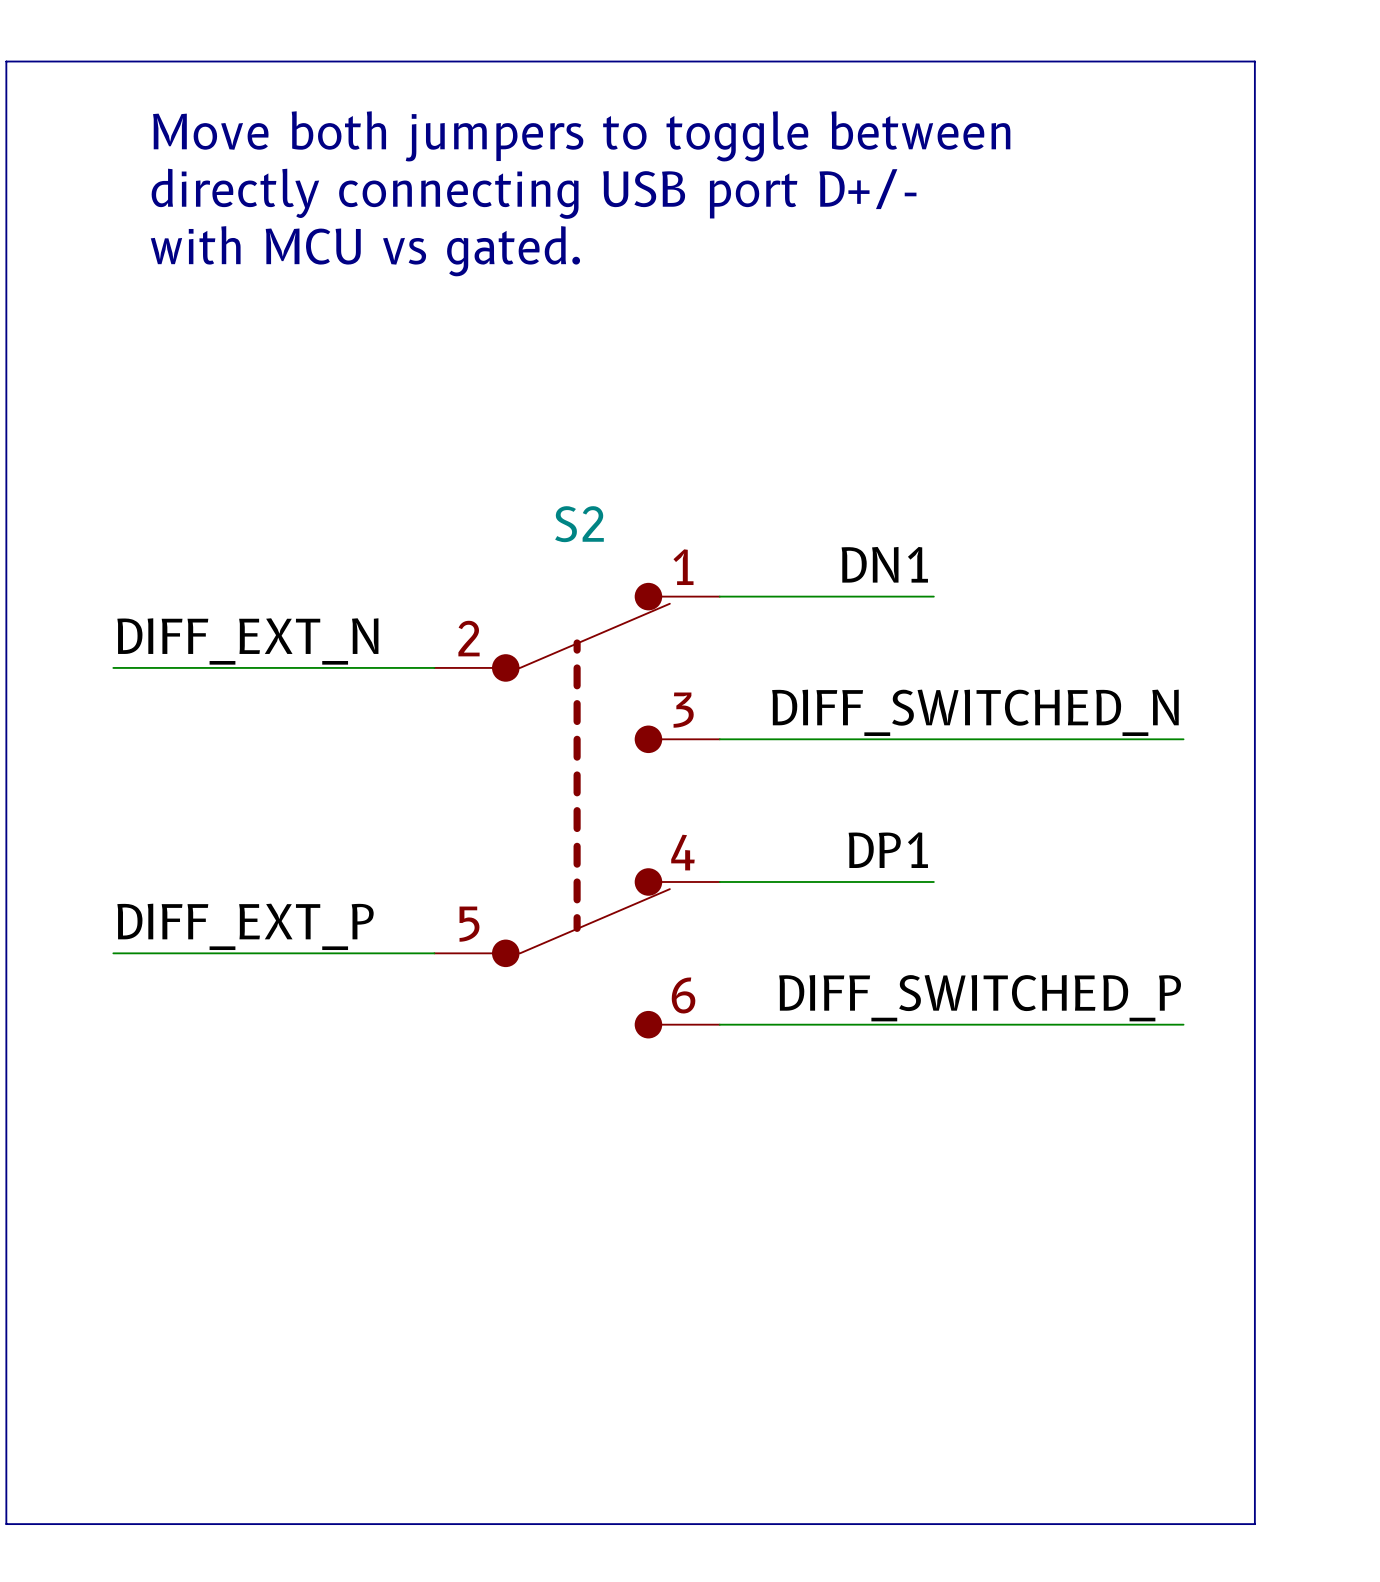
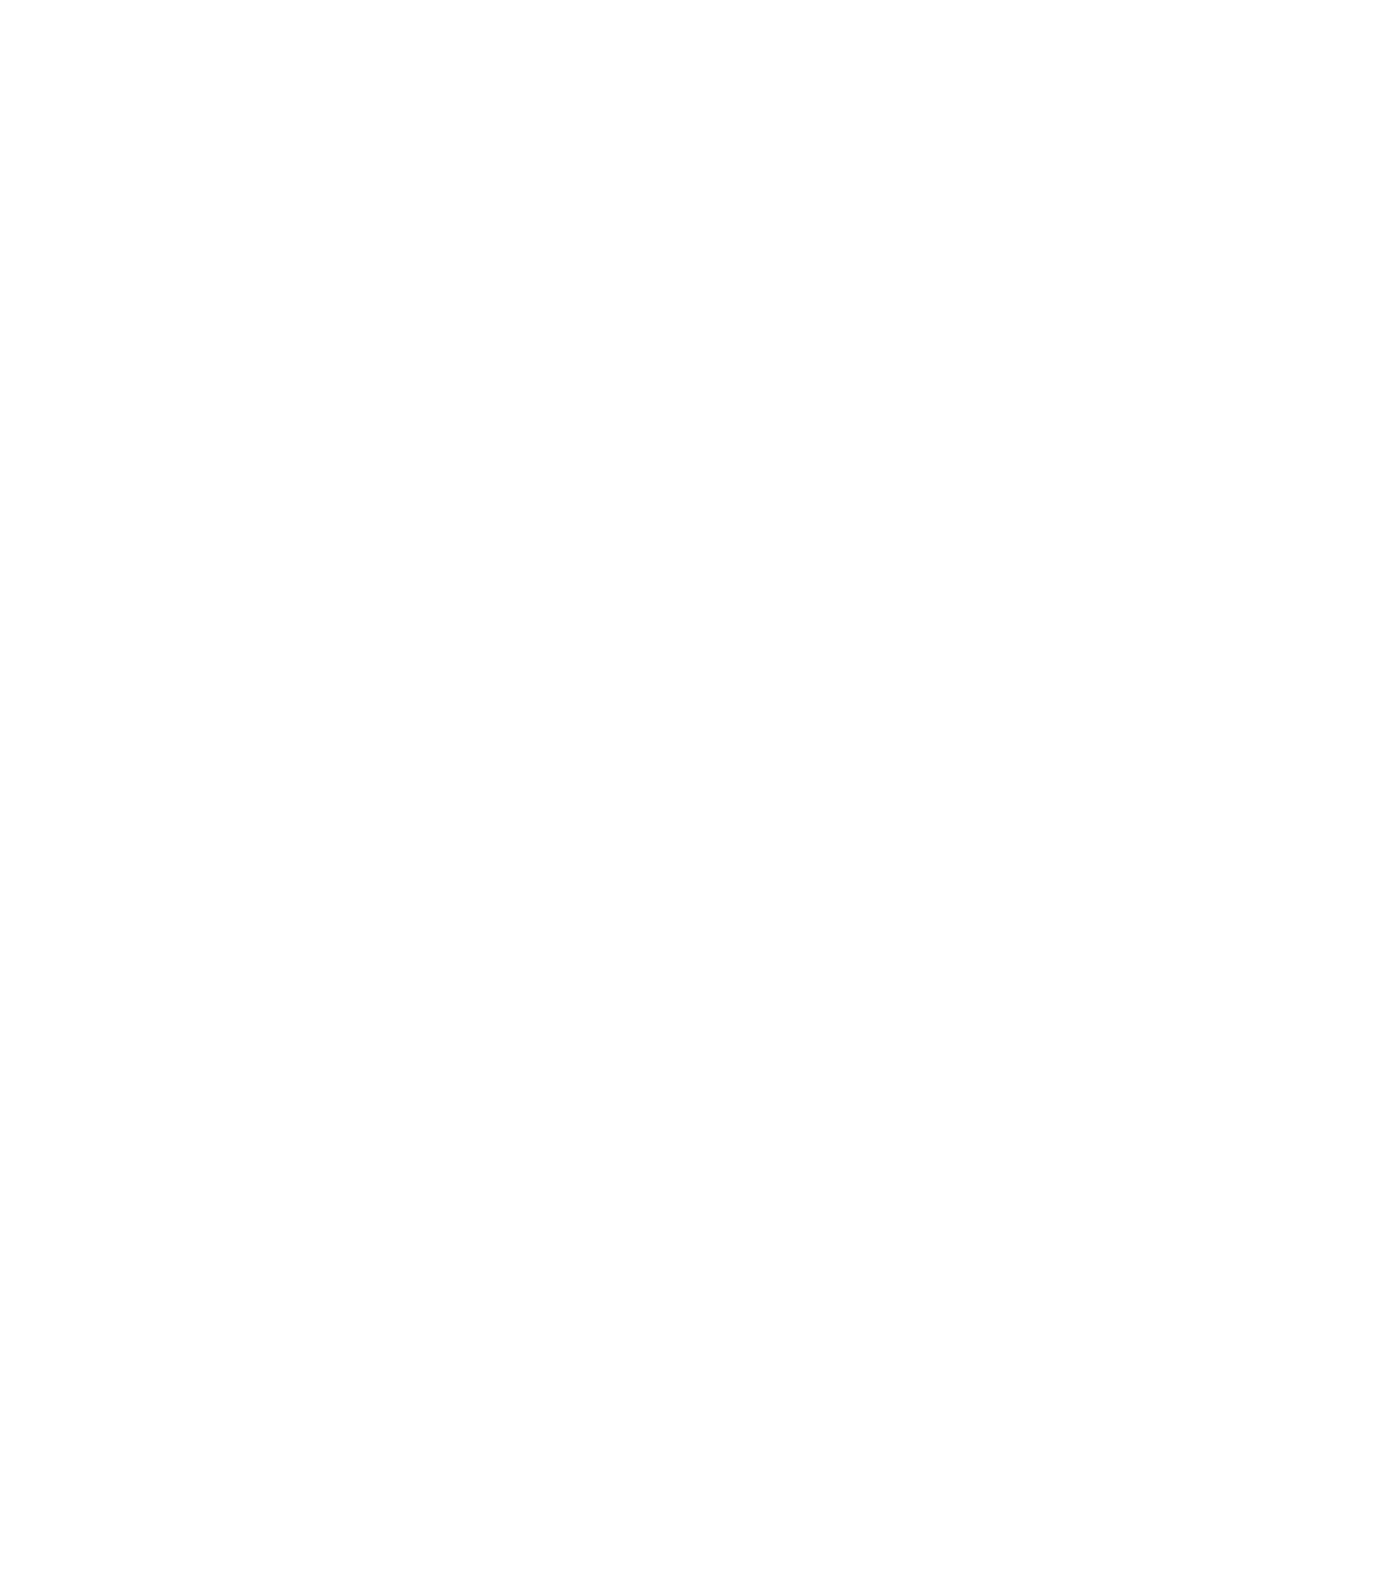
line: (6, 61) (6, 1524) (1254, 1524) (1254, 61) (6, 61) -> none
text: Move both jumpers to toggle between (581, 136) -> none
text: directly connecting USB port D+/- (534, 193) -> none
text: with MCU vs gated. (365, 251) -> none
label: DN1 (884, 564) -> none
wire: (719, 596) (933, 596) -> none
label: DIFF_EXT_N (247, 641) -> none
wire: (113, 667) (434, 667) -> none
label: DIFF_SWITCHED_N (975, 712) -> none
wire: (719, 739) (1183, 739) -> none
S2: (577, 810) -> none
label: DP1 (888, 850) -> none
wire: (719, 881) (933, 881) -> none
label: DIFF_EXT_P (245, 926) -> none
wire: (113, 953) (434, 953) -> none
label: DIFF_SWITCHED_P (980, 998) -> none
wire: (719, 1024) (1183, 1024) -> none

